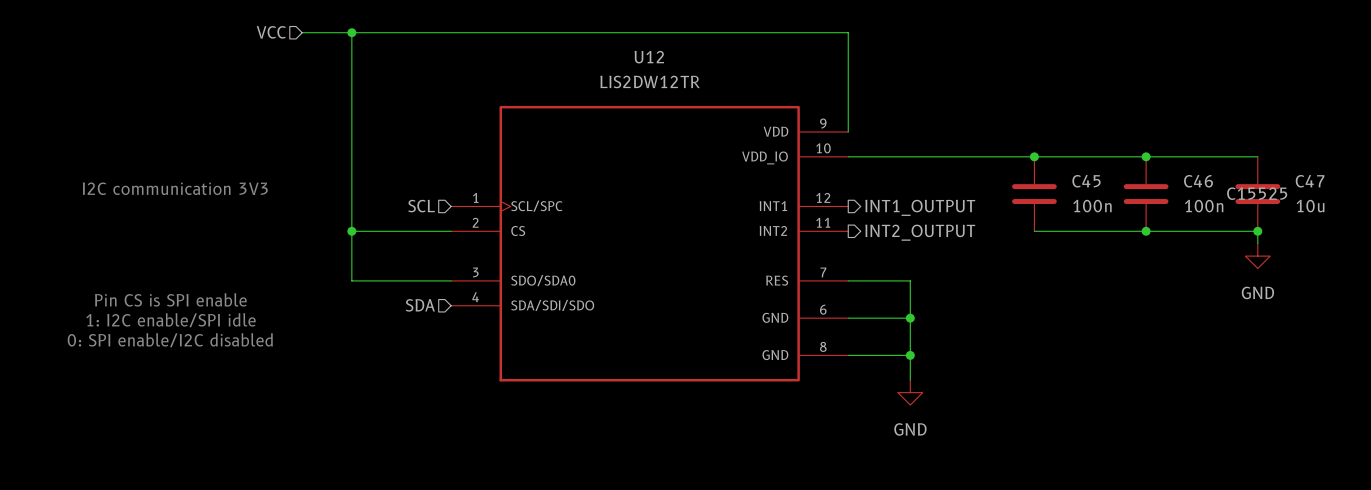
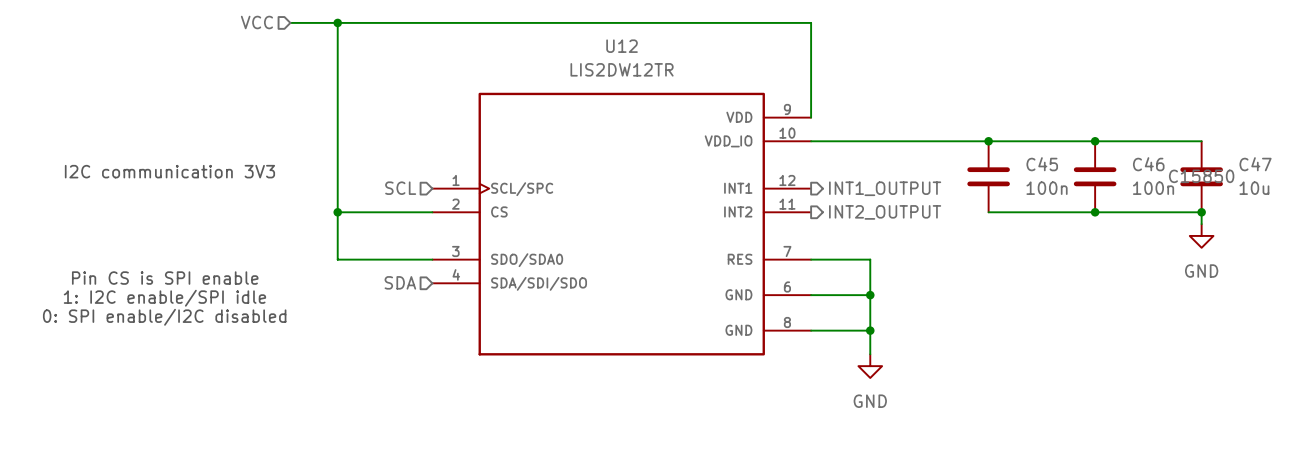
C47 text: C15525 (1257, 193) -> C15850 (1201, 176)

